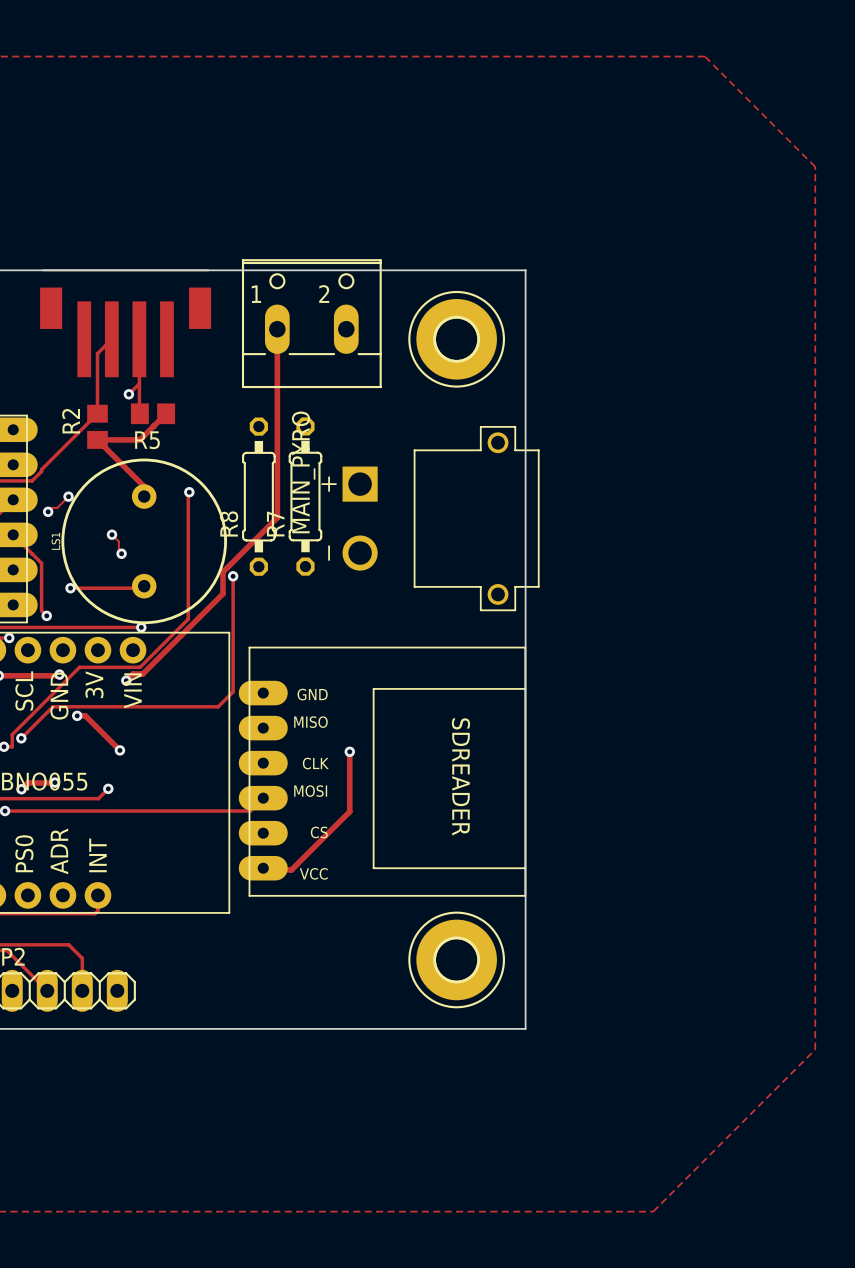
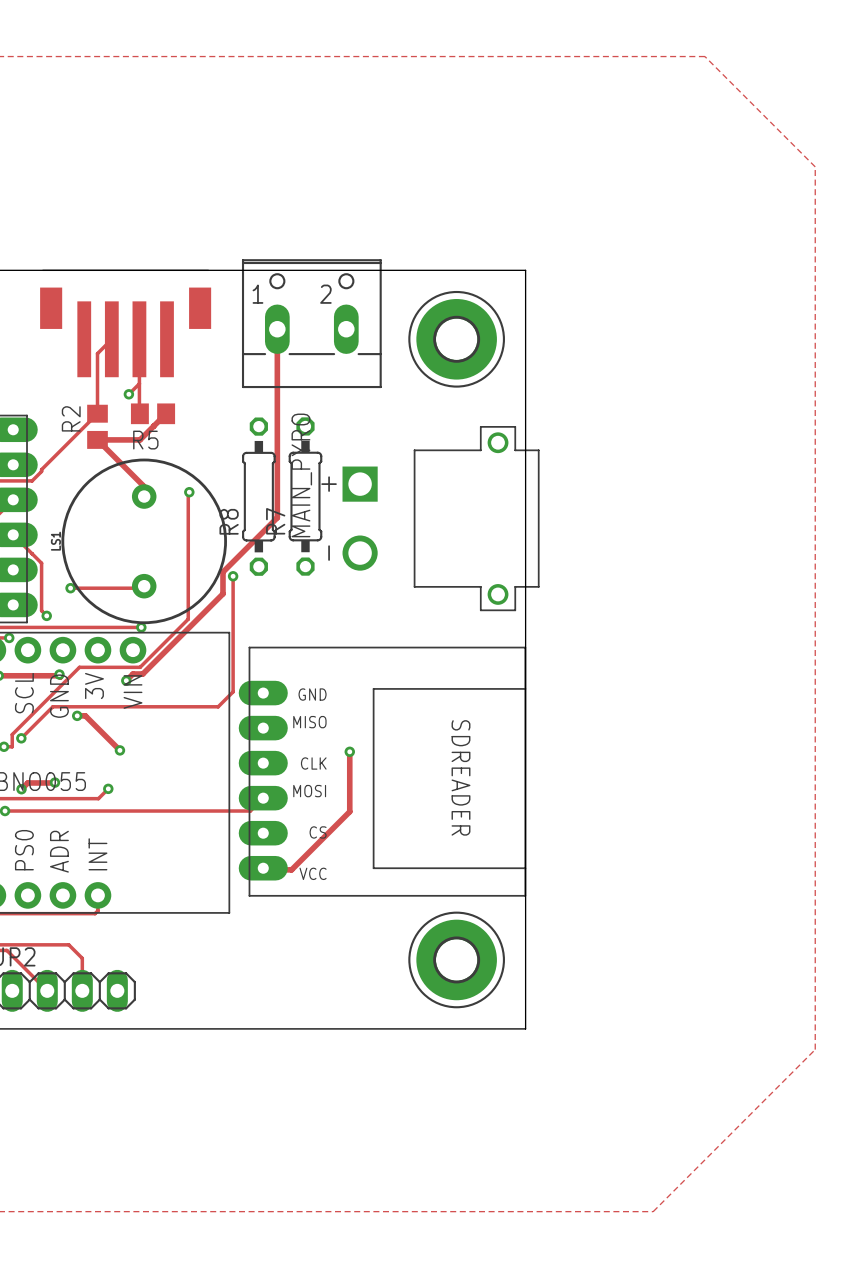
track: (68, 496) (57, 507) (48, 507) (48, 511) -> none
via: (68, 496) -> none
via: (48, 511) -> none
track: (112, 534) (118, 541) (118, 553) (121, 553) -> none
via: (112, 534) -> none
via: (121, 553) -> none

